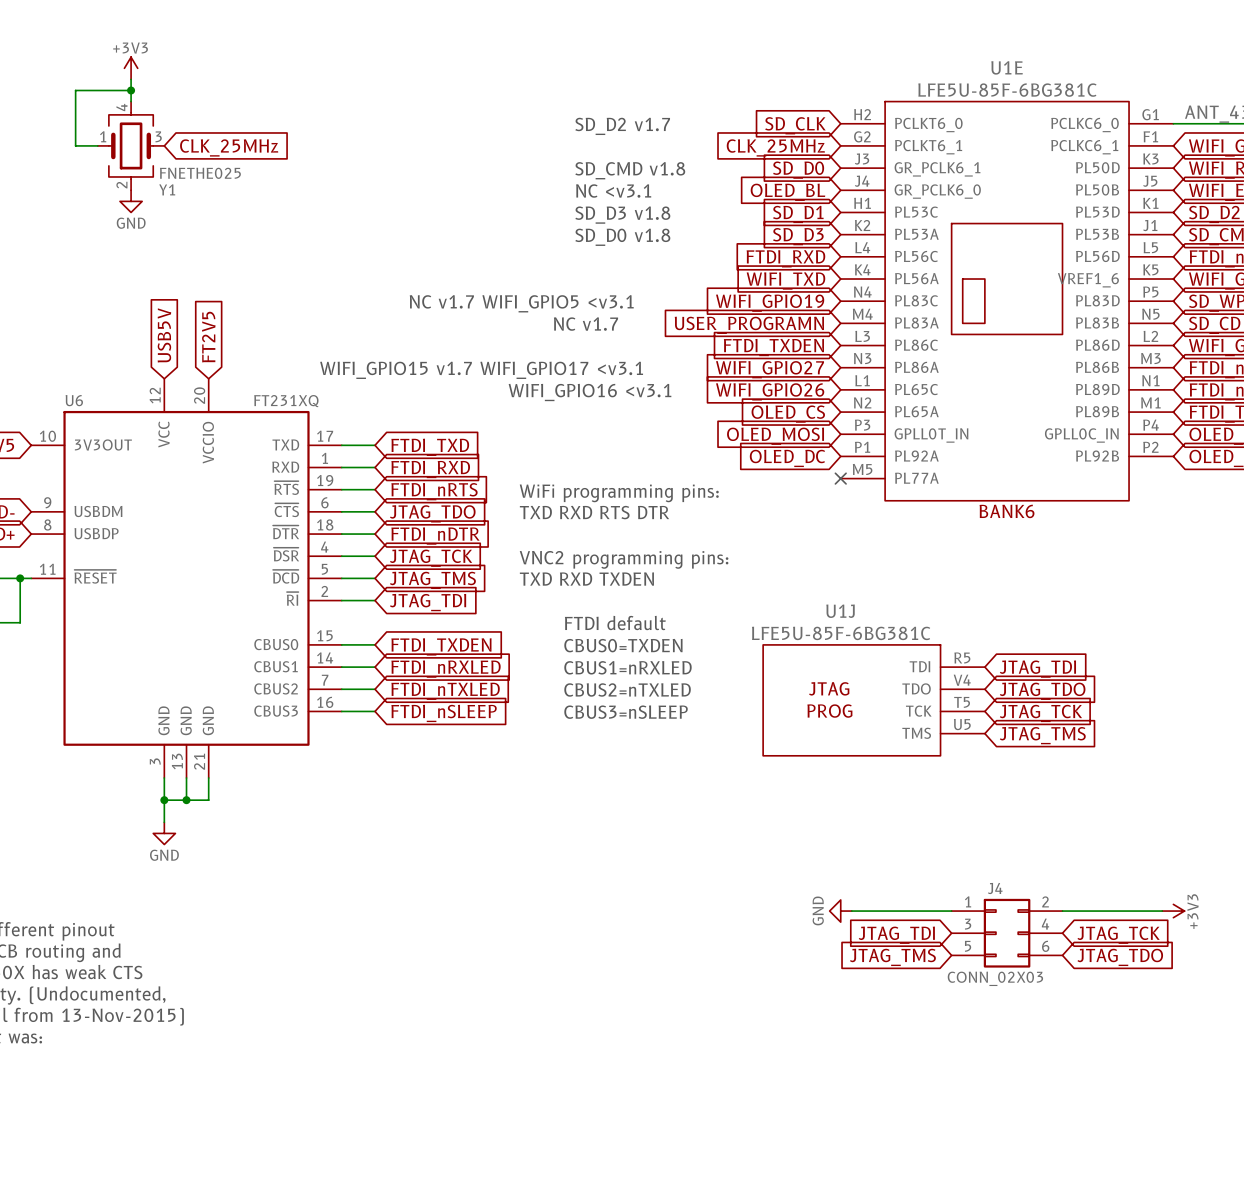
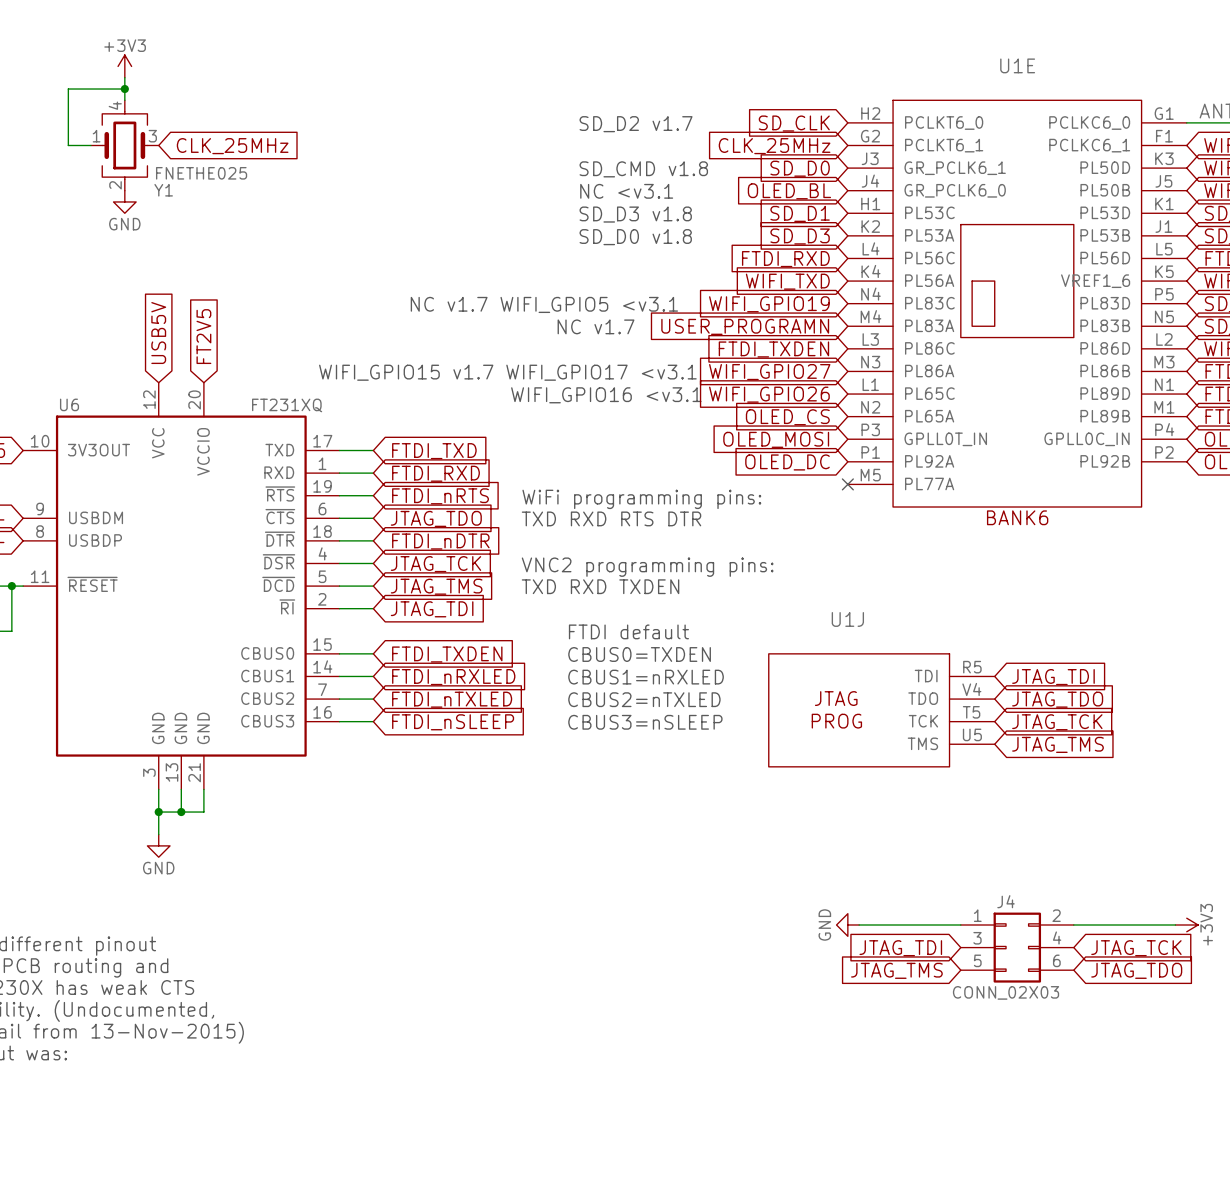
U1E value: LFE5U-85F-6BG381C (1007, 90) -> none
U1J value: LFE5U-85F-6BG381C (841, 633) -> none

